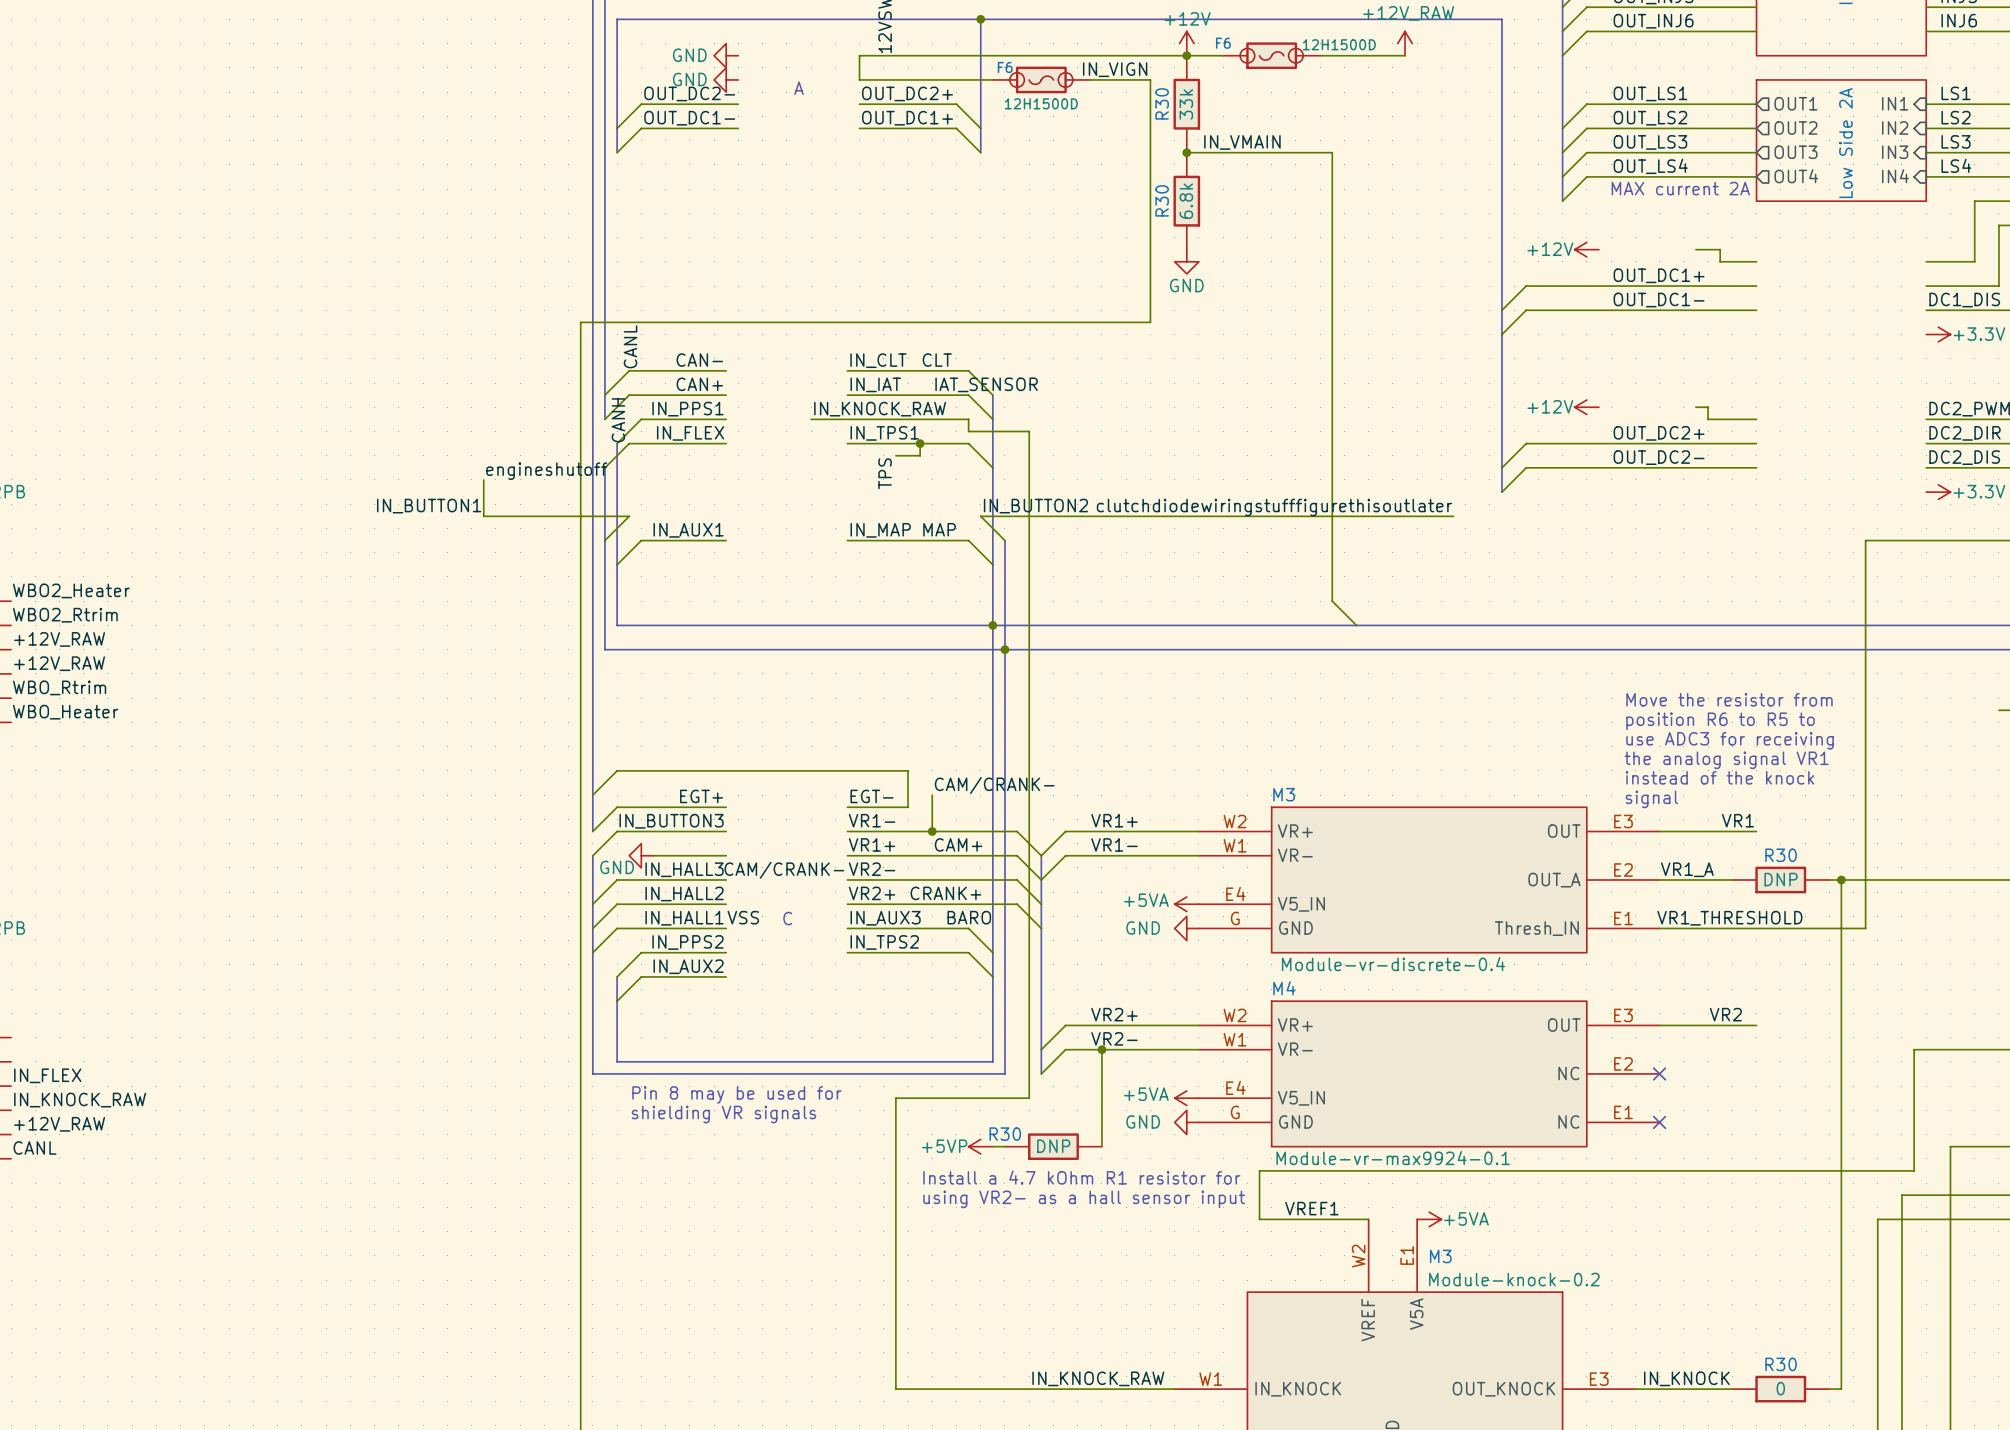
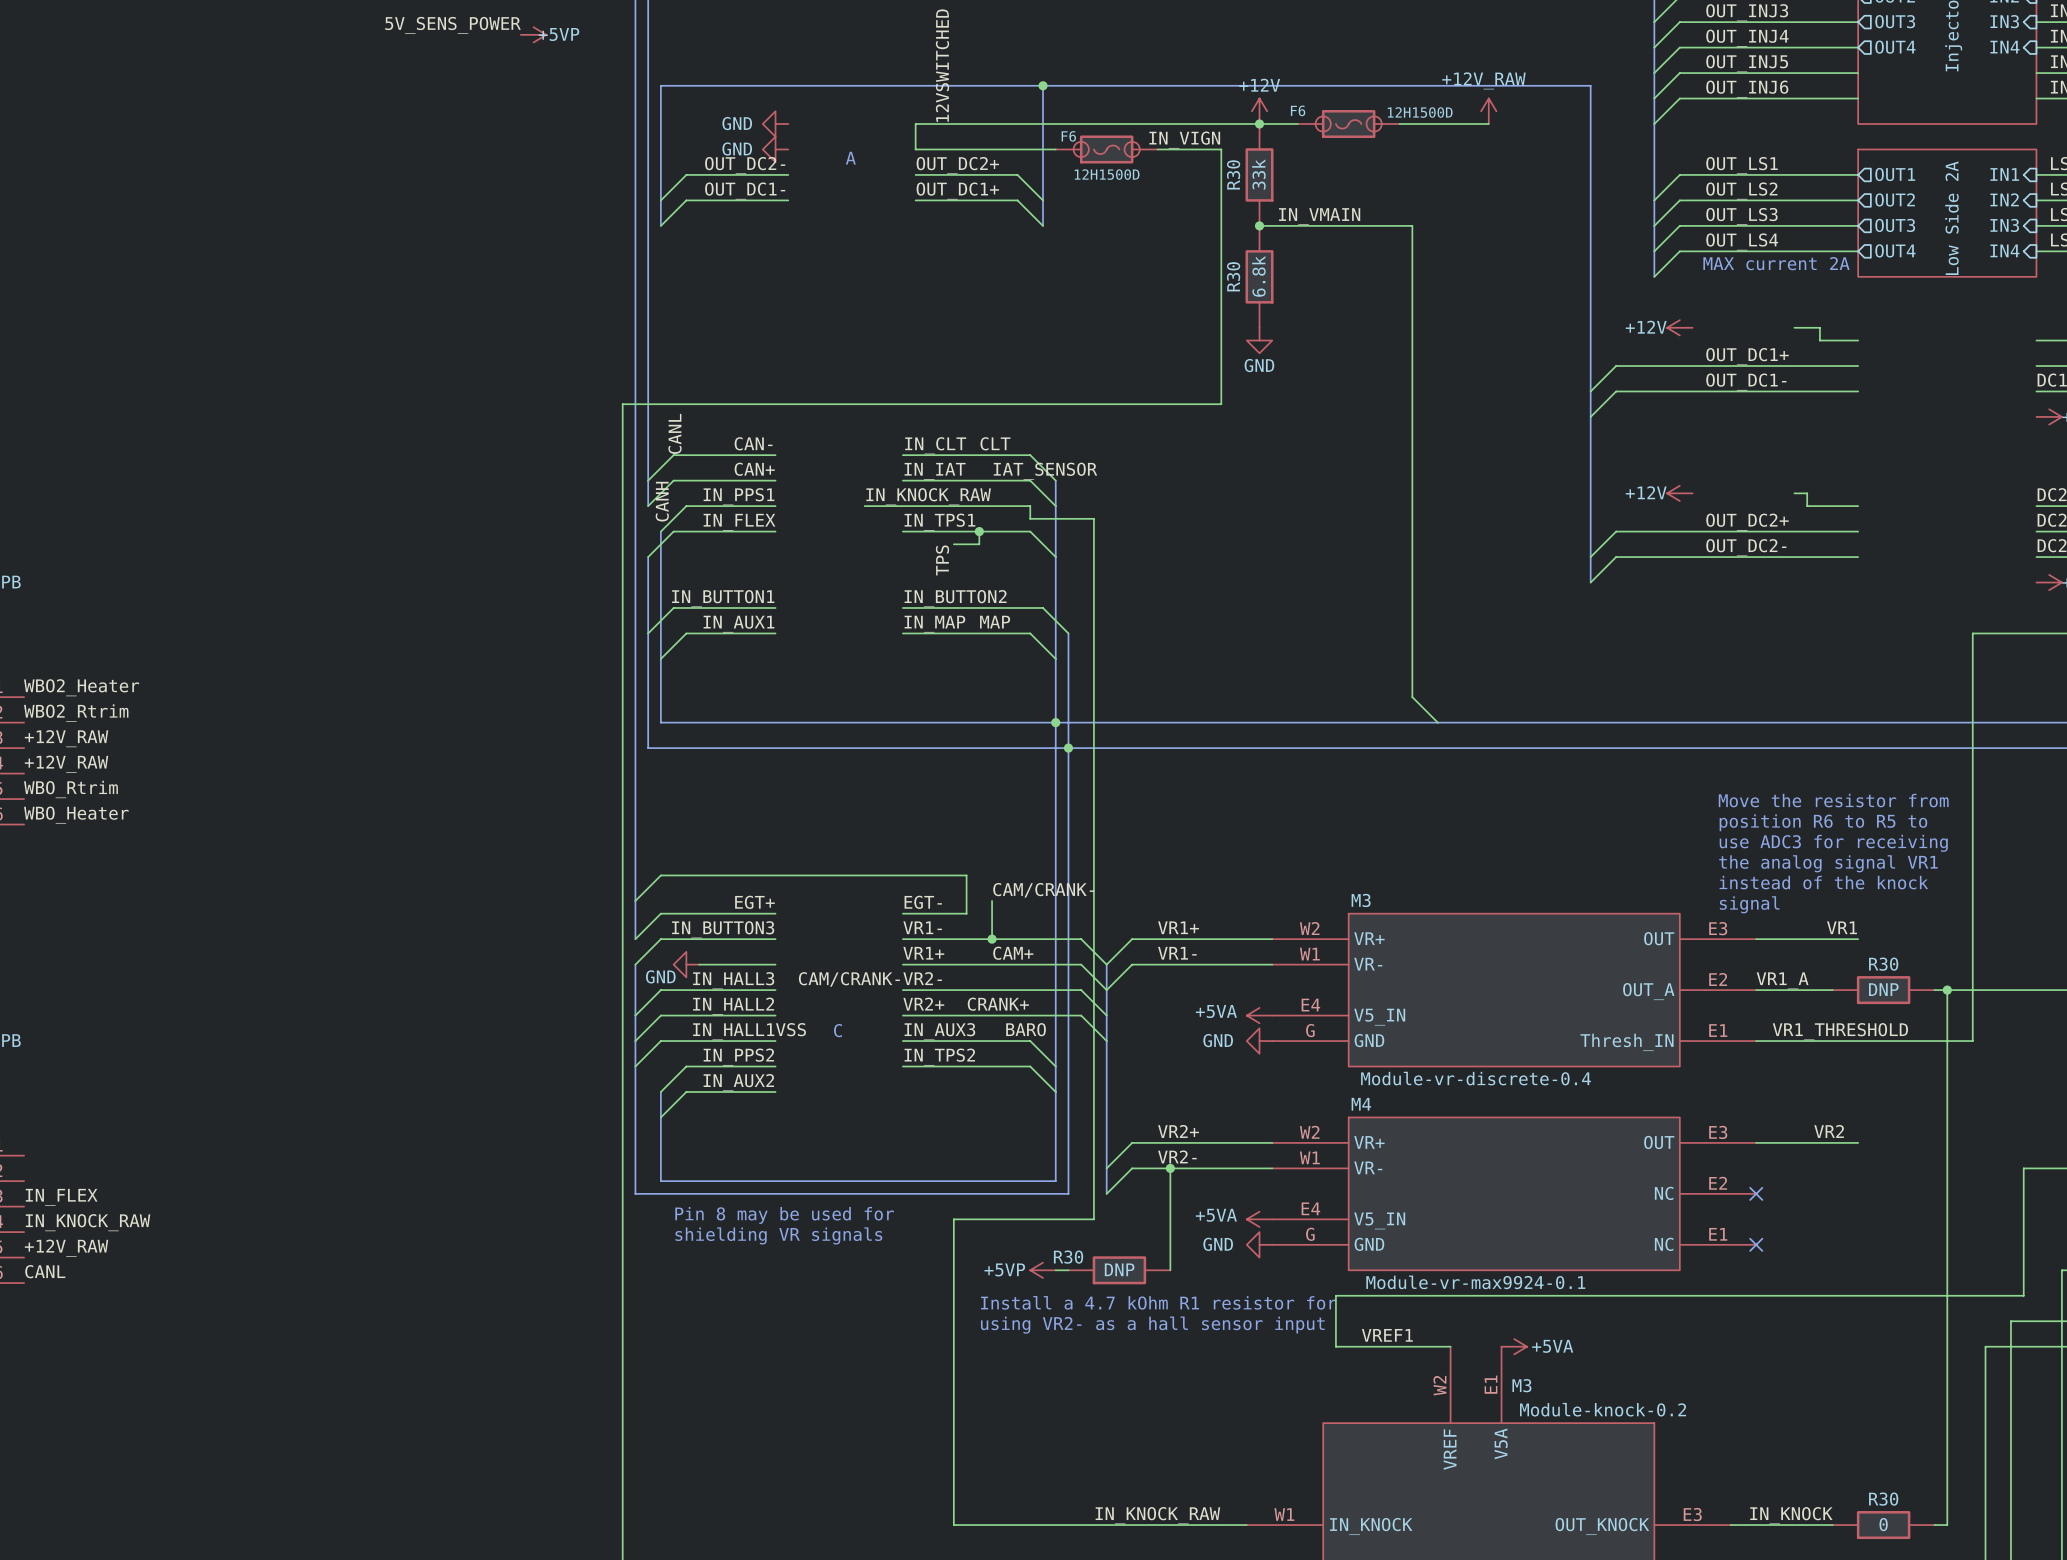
label: engineshutoff (546, 471) -> none
wire: (483, 479) (483, 516) (629, 516) -> (775, 607) (673, 607)
label: IN_BUTTON1 (429, 506) -> none
label: none -> IN_BUTTON1 (723, 598)
label position: IN_BUTTON2 (1035, 506) -> IN_BUTTON2 (955, 598)
label: clutchdiodewiringstufffigurethisoutlater (1274, 507) -> none
wire: (980, 516) (1453, 516) -> (1043, 607) (902, 607)

